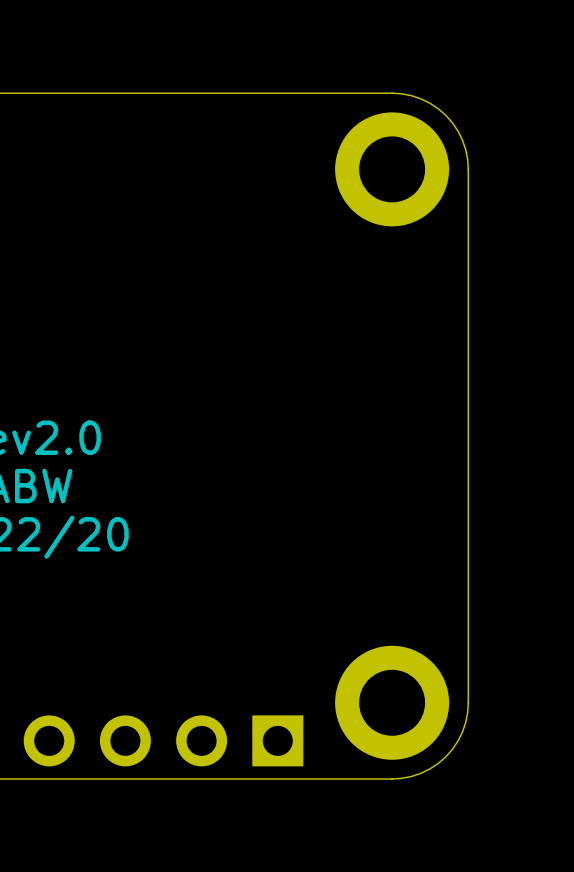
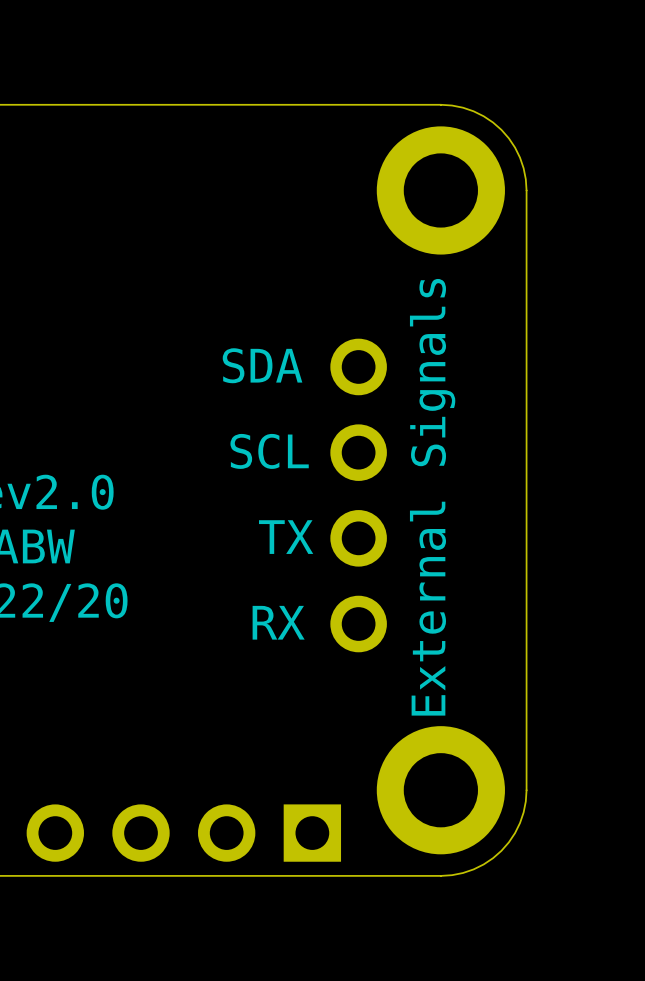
text: none -> SDA (262, 365)
part: none -> (358, 366)
text: none -> SCL (269, 451)
part: none -> (358, 452)
text: none -> External Signals (432, 497)
text: none -> TX (286, 537)
part: none -> (358, 538)
text: none -> RX (278, 622)
part: none -> (358, 624)

